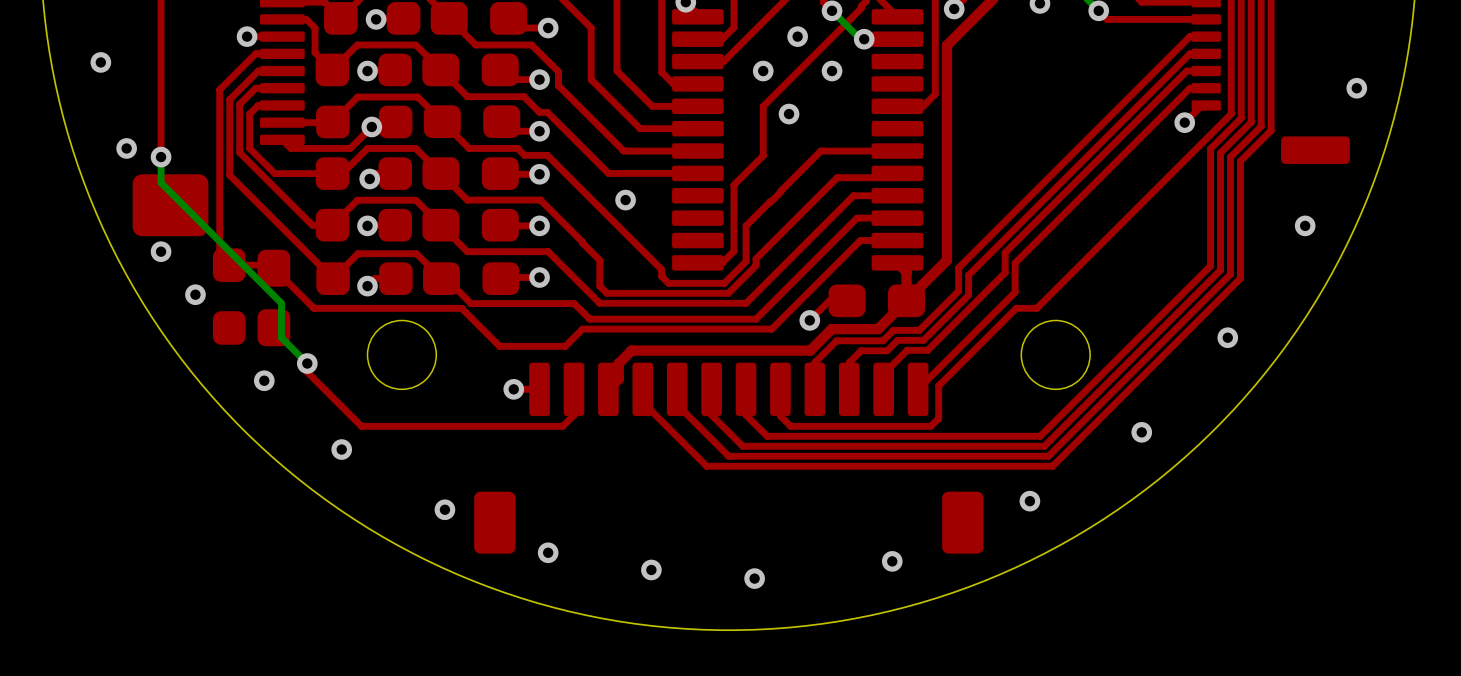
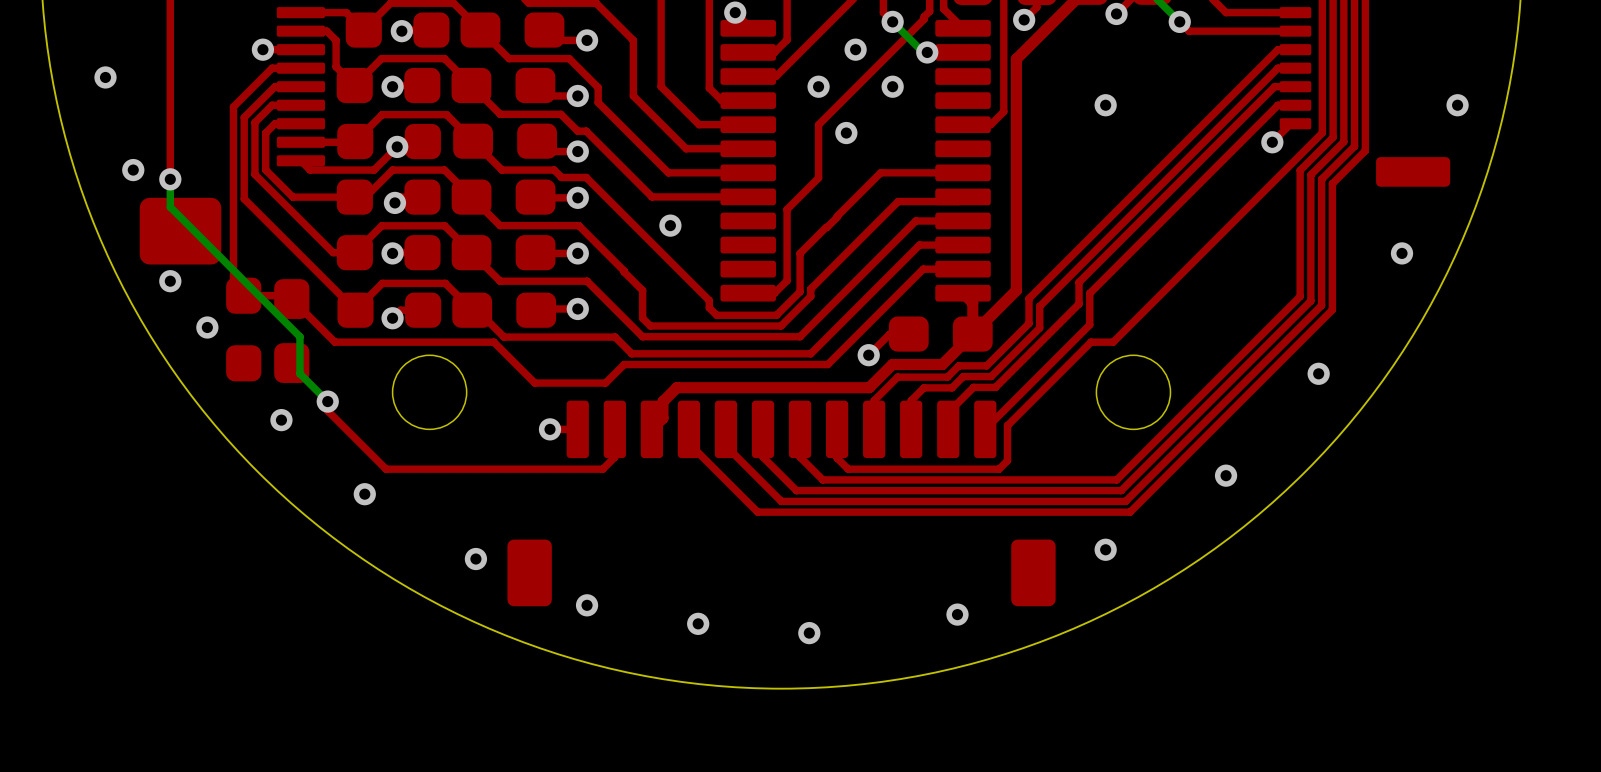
via: none -> (1105, 105)

